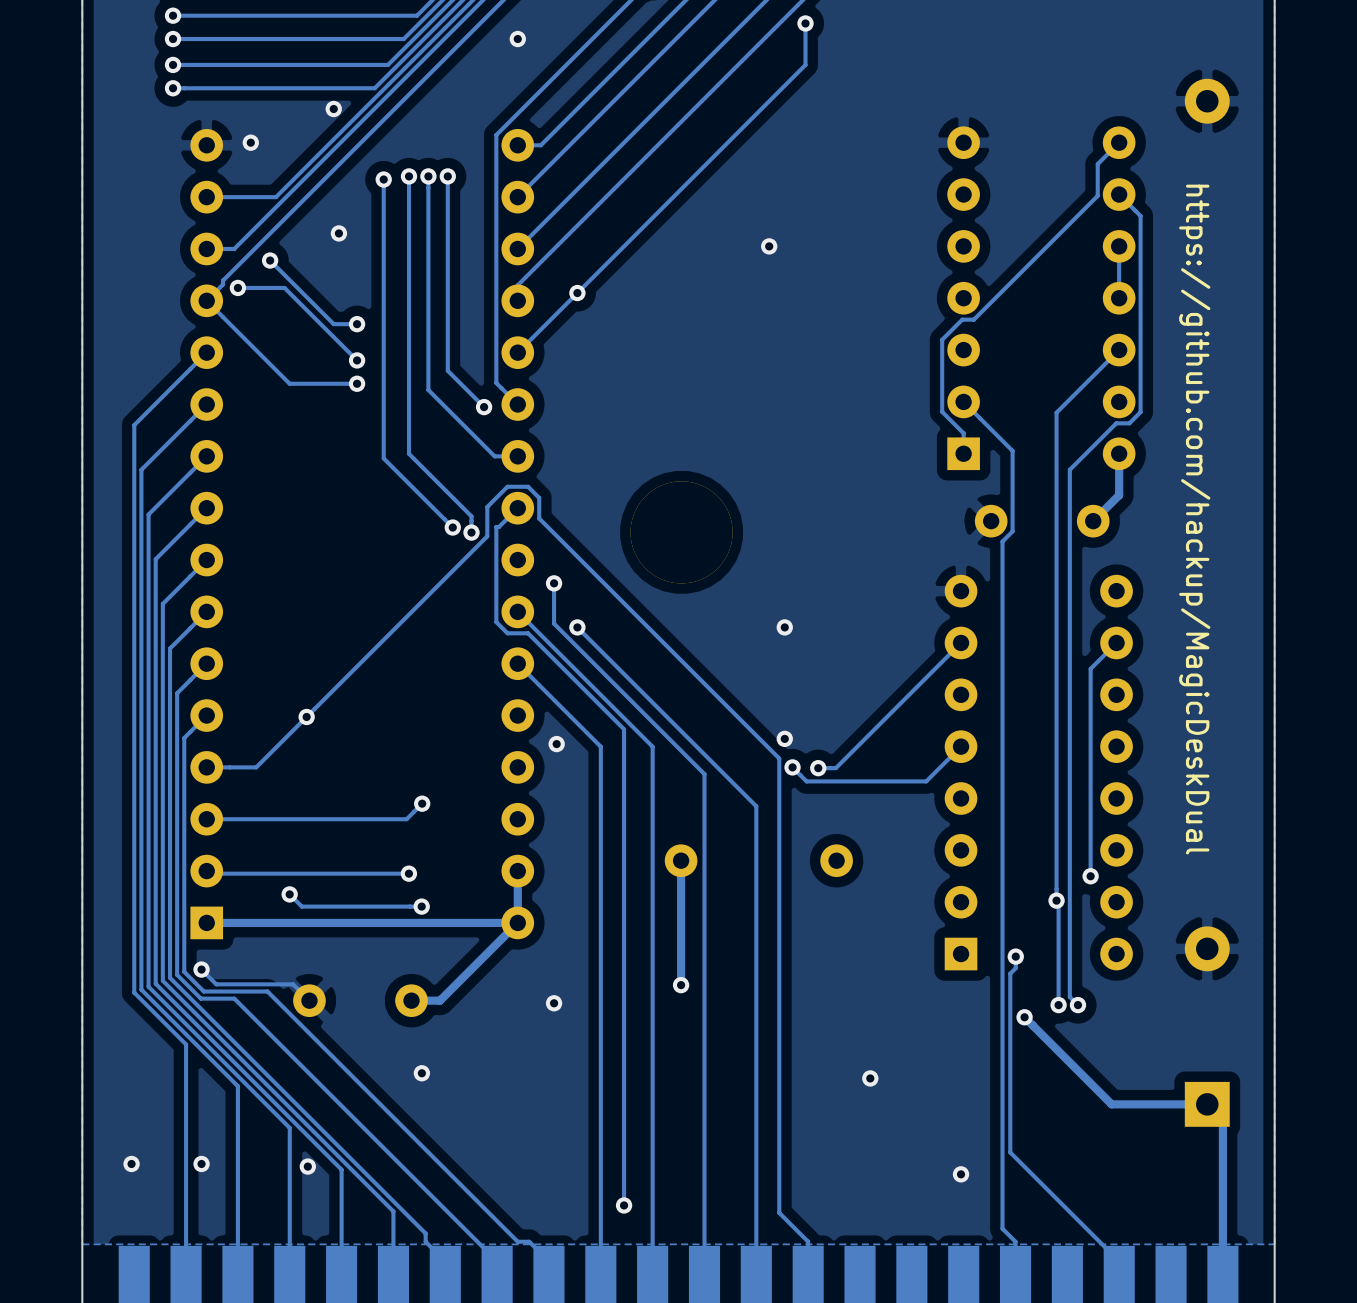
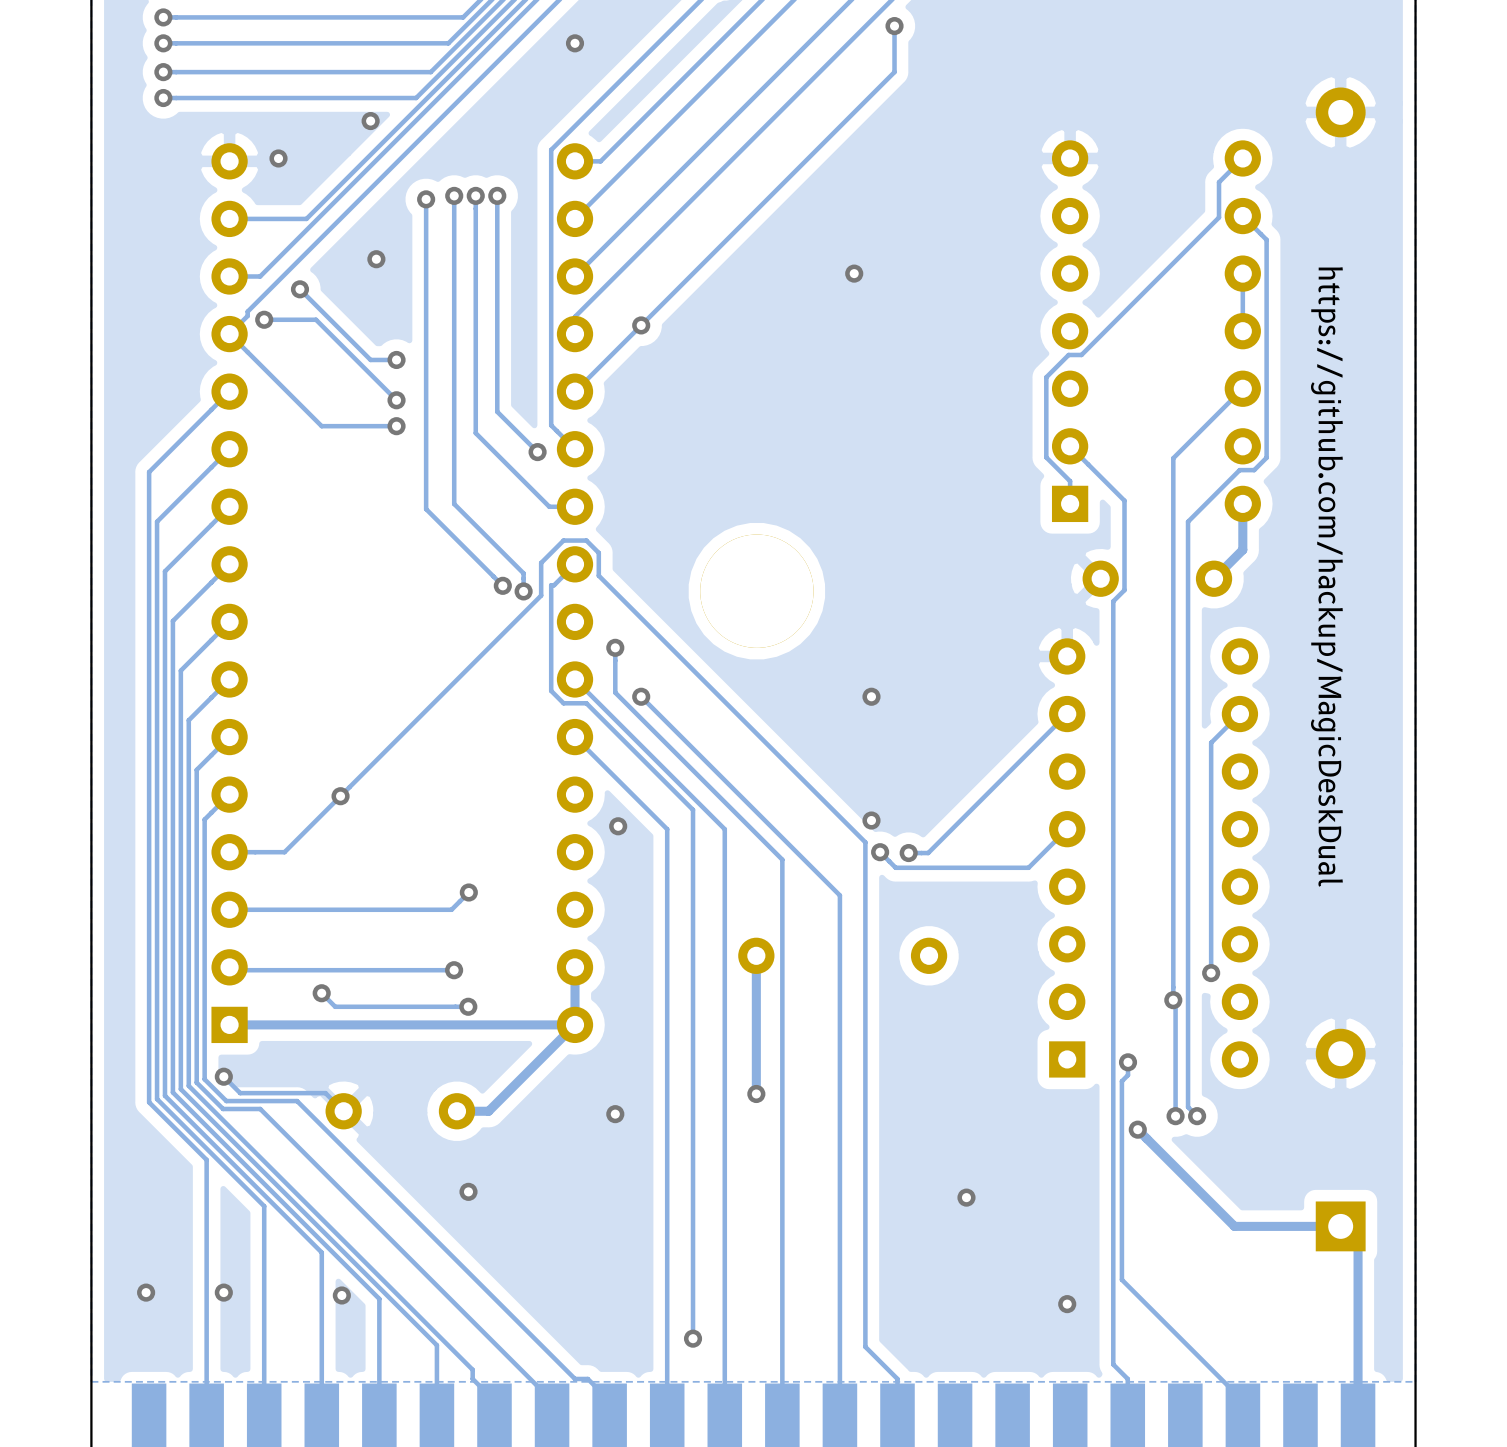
via: none -> (163, 17)
track: none -> (192, 17) (163, 17)
via: (173, 15) -> none
via: none -> (163, 43)
track: none -> (192, 43) (163, 43)
via: (173, 39) -> none
via: none -> (163, 72)
track: none -> (192, 72) (163, 72)
via: (173, 64) -> none
via: none -> (163, 98)
track: none -> (192, 98) (163, 98)
via: (173, 88) -> none

